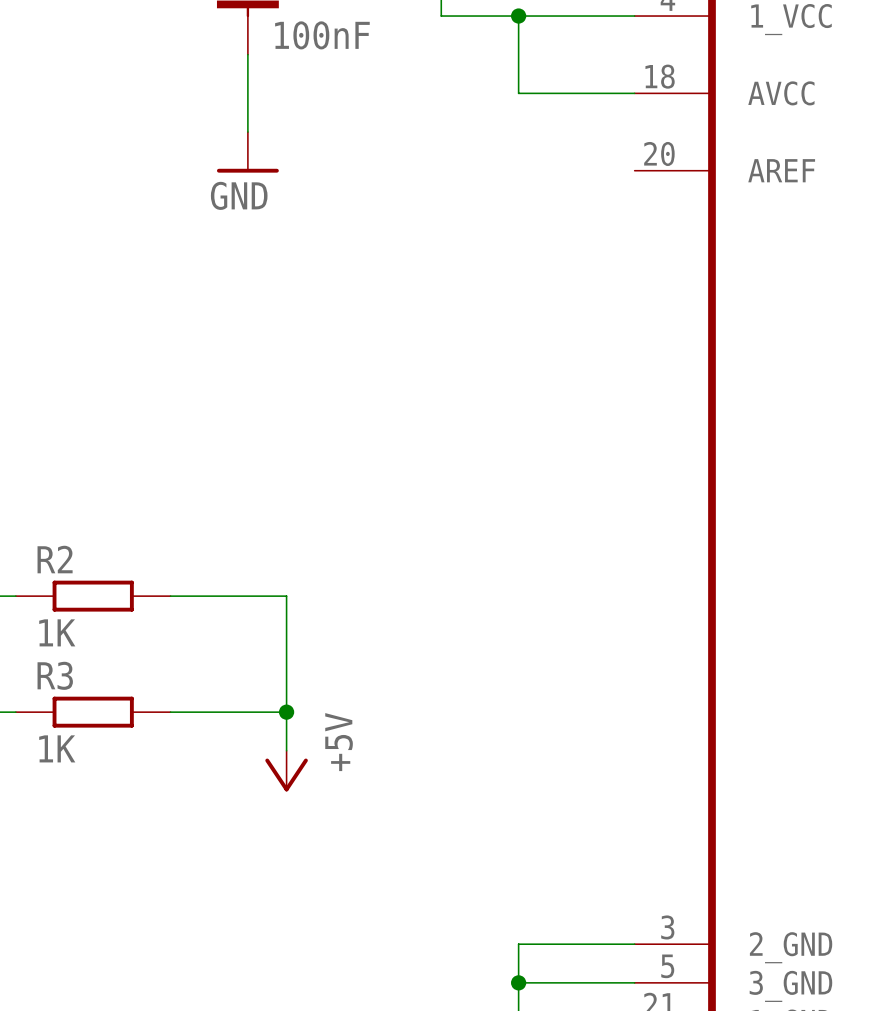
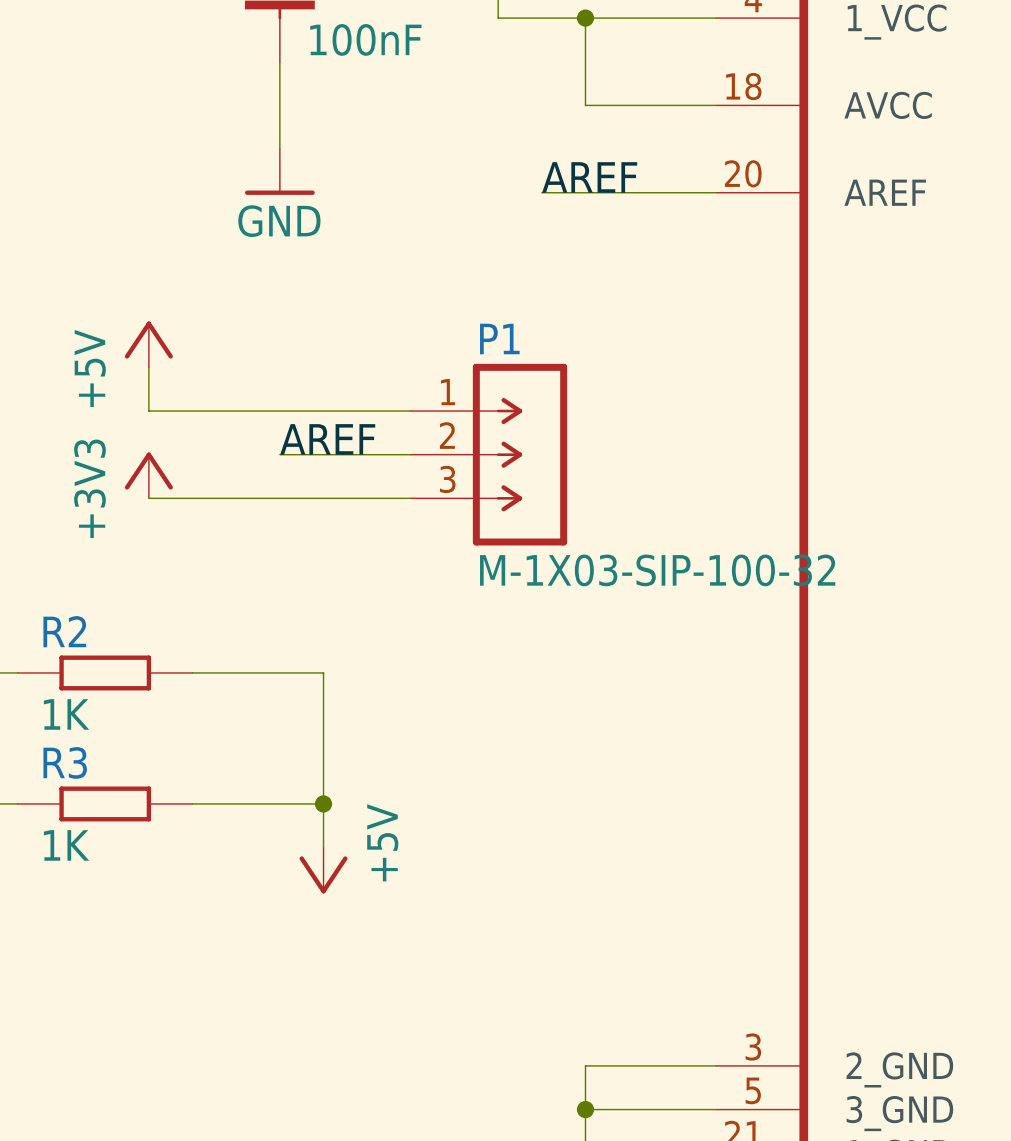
label: none -> AREF (589, 177)
wire: none -> (541, 192) (716, 192)
power symbol: none -> +5V (148, 344)
wire: none -> (148, 367) (148, 411) (410, 411)
label: none -> AREF (327, 439)
wire: none -> (279, 454) (410, 454)
P1: none -> M-1X03-SIP-100-32 (488, 454)
power symbol: none -> +3V3 (148, 475)
wire: none -> (148, 498) (410, 498)

